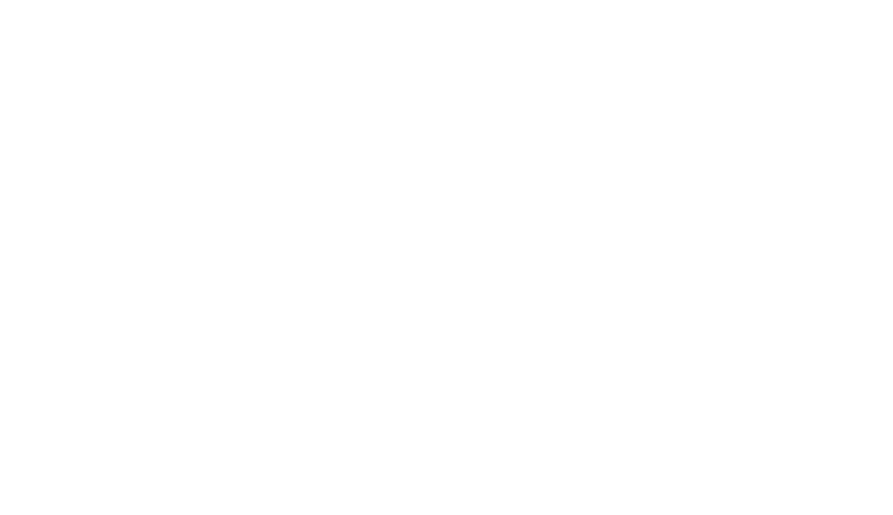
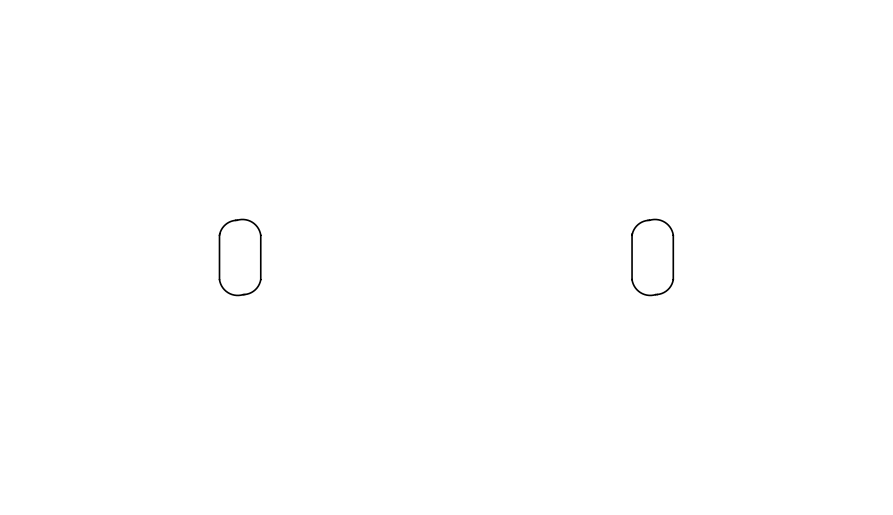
board edge: none -> (237, 220) (225, 224) (219, 233) (219, 279) (226, 291) (238, 295) (253, 291) (260, 281) (260, 235) (258, 228) (252, 222) (243, 219) (237, 220)
board edge: none -> (649, 220) (638, 224) (632, 233) (632, 279) (638, 291) (651, 295) (666, 291) (672, 281) (673, 235) (671, 228) (664, 222) (656, 219) (649, 220)

